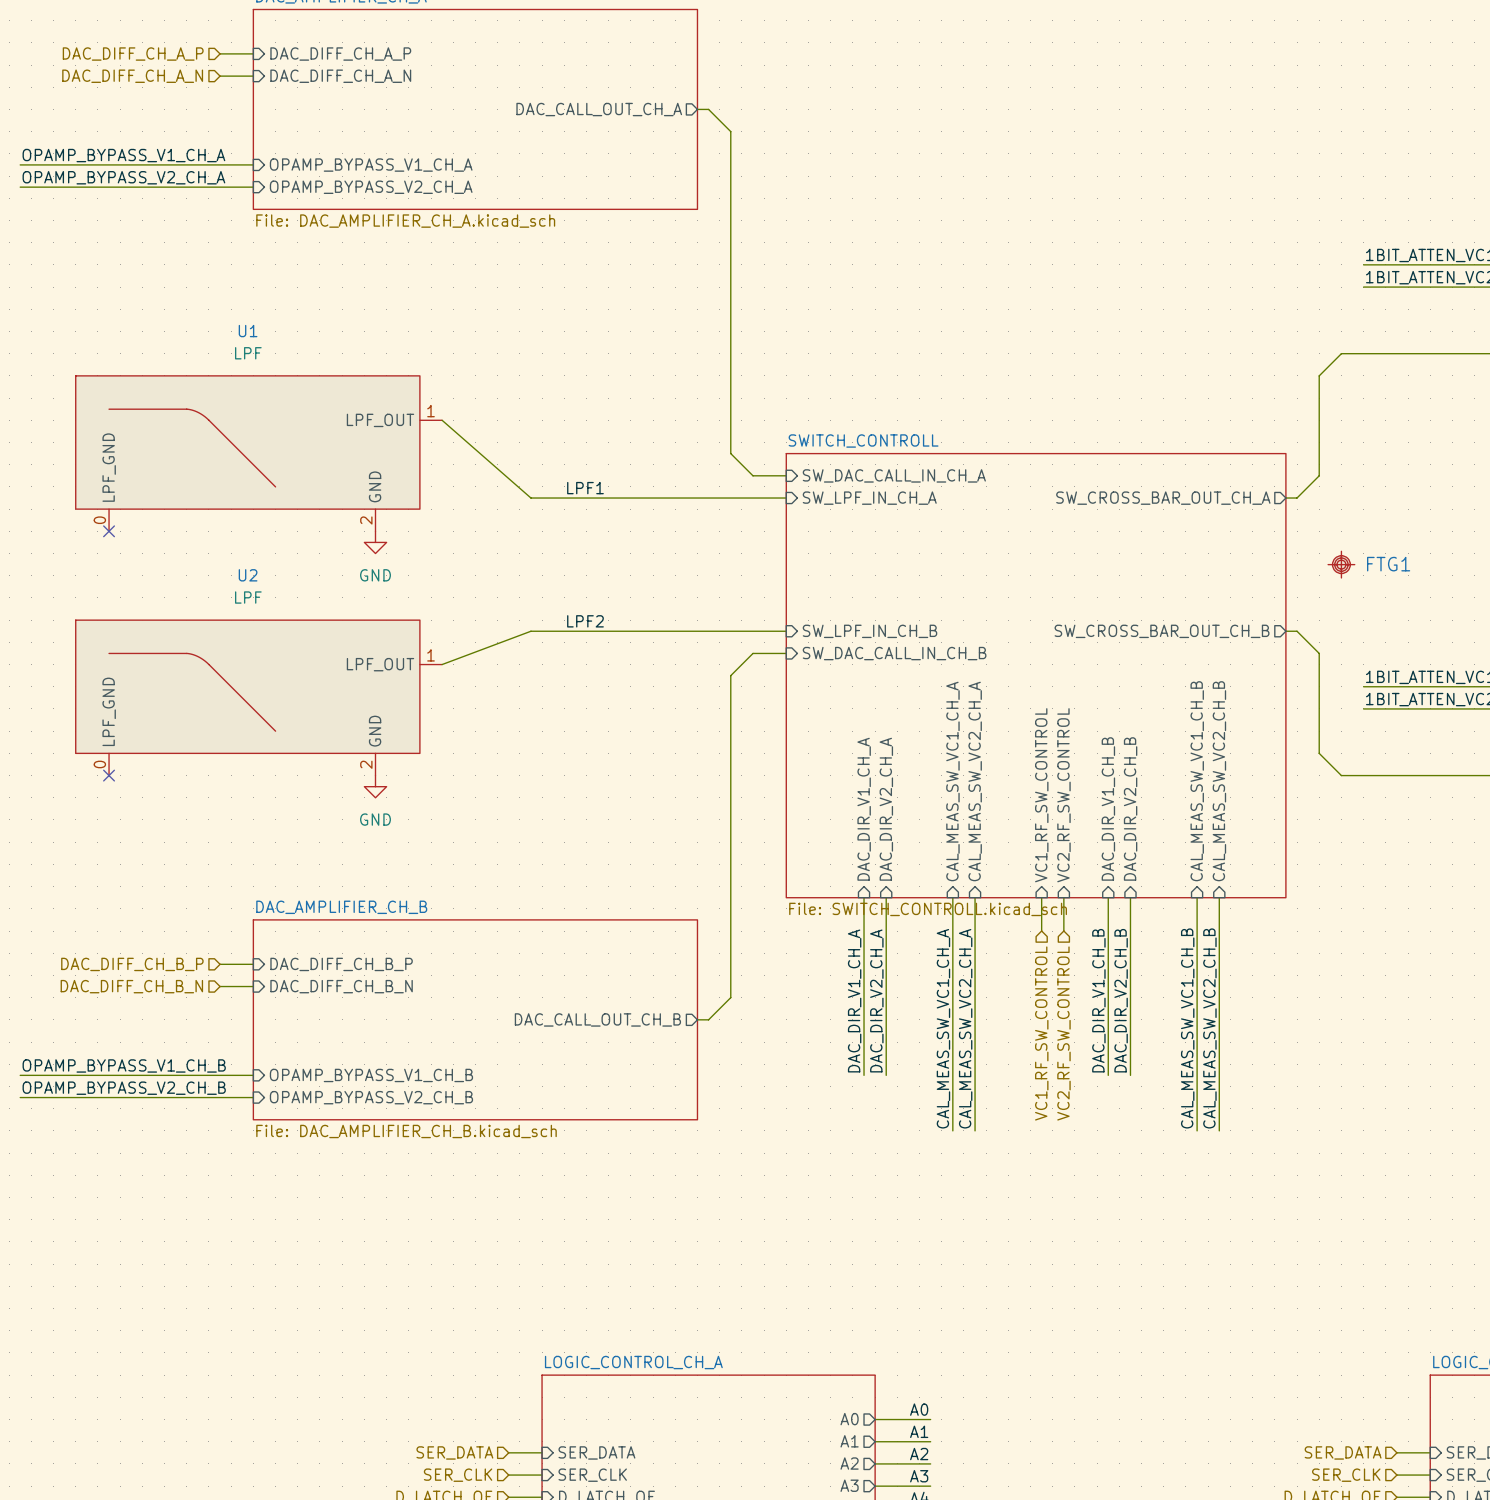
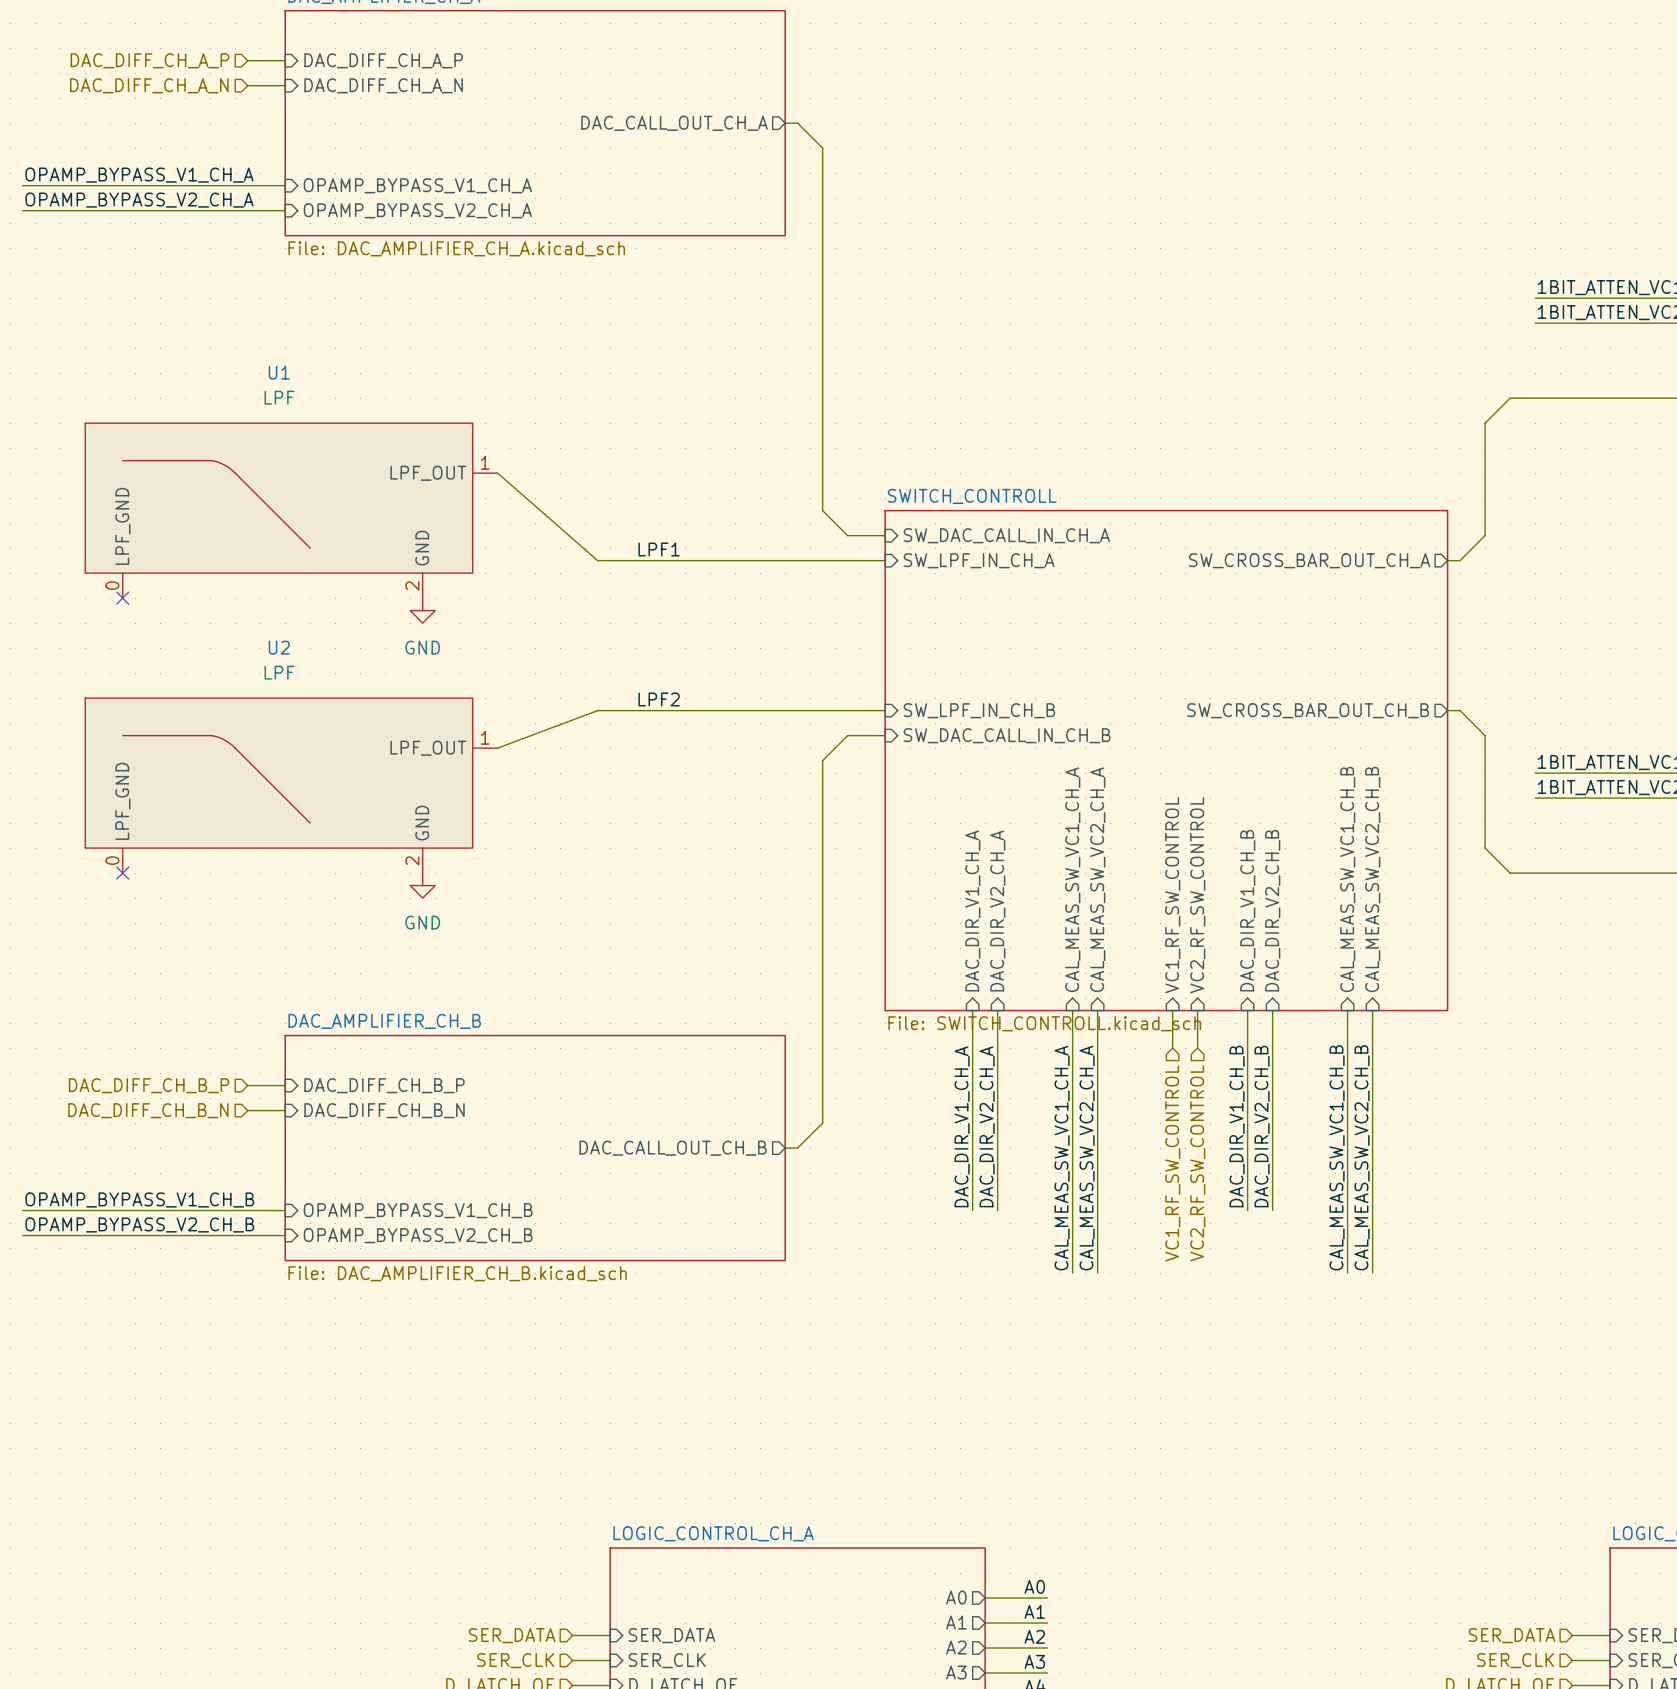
FTG1: (1341, 564) -> none

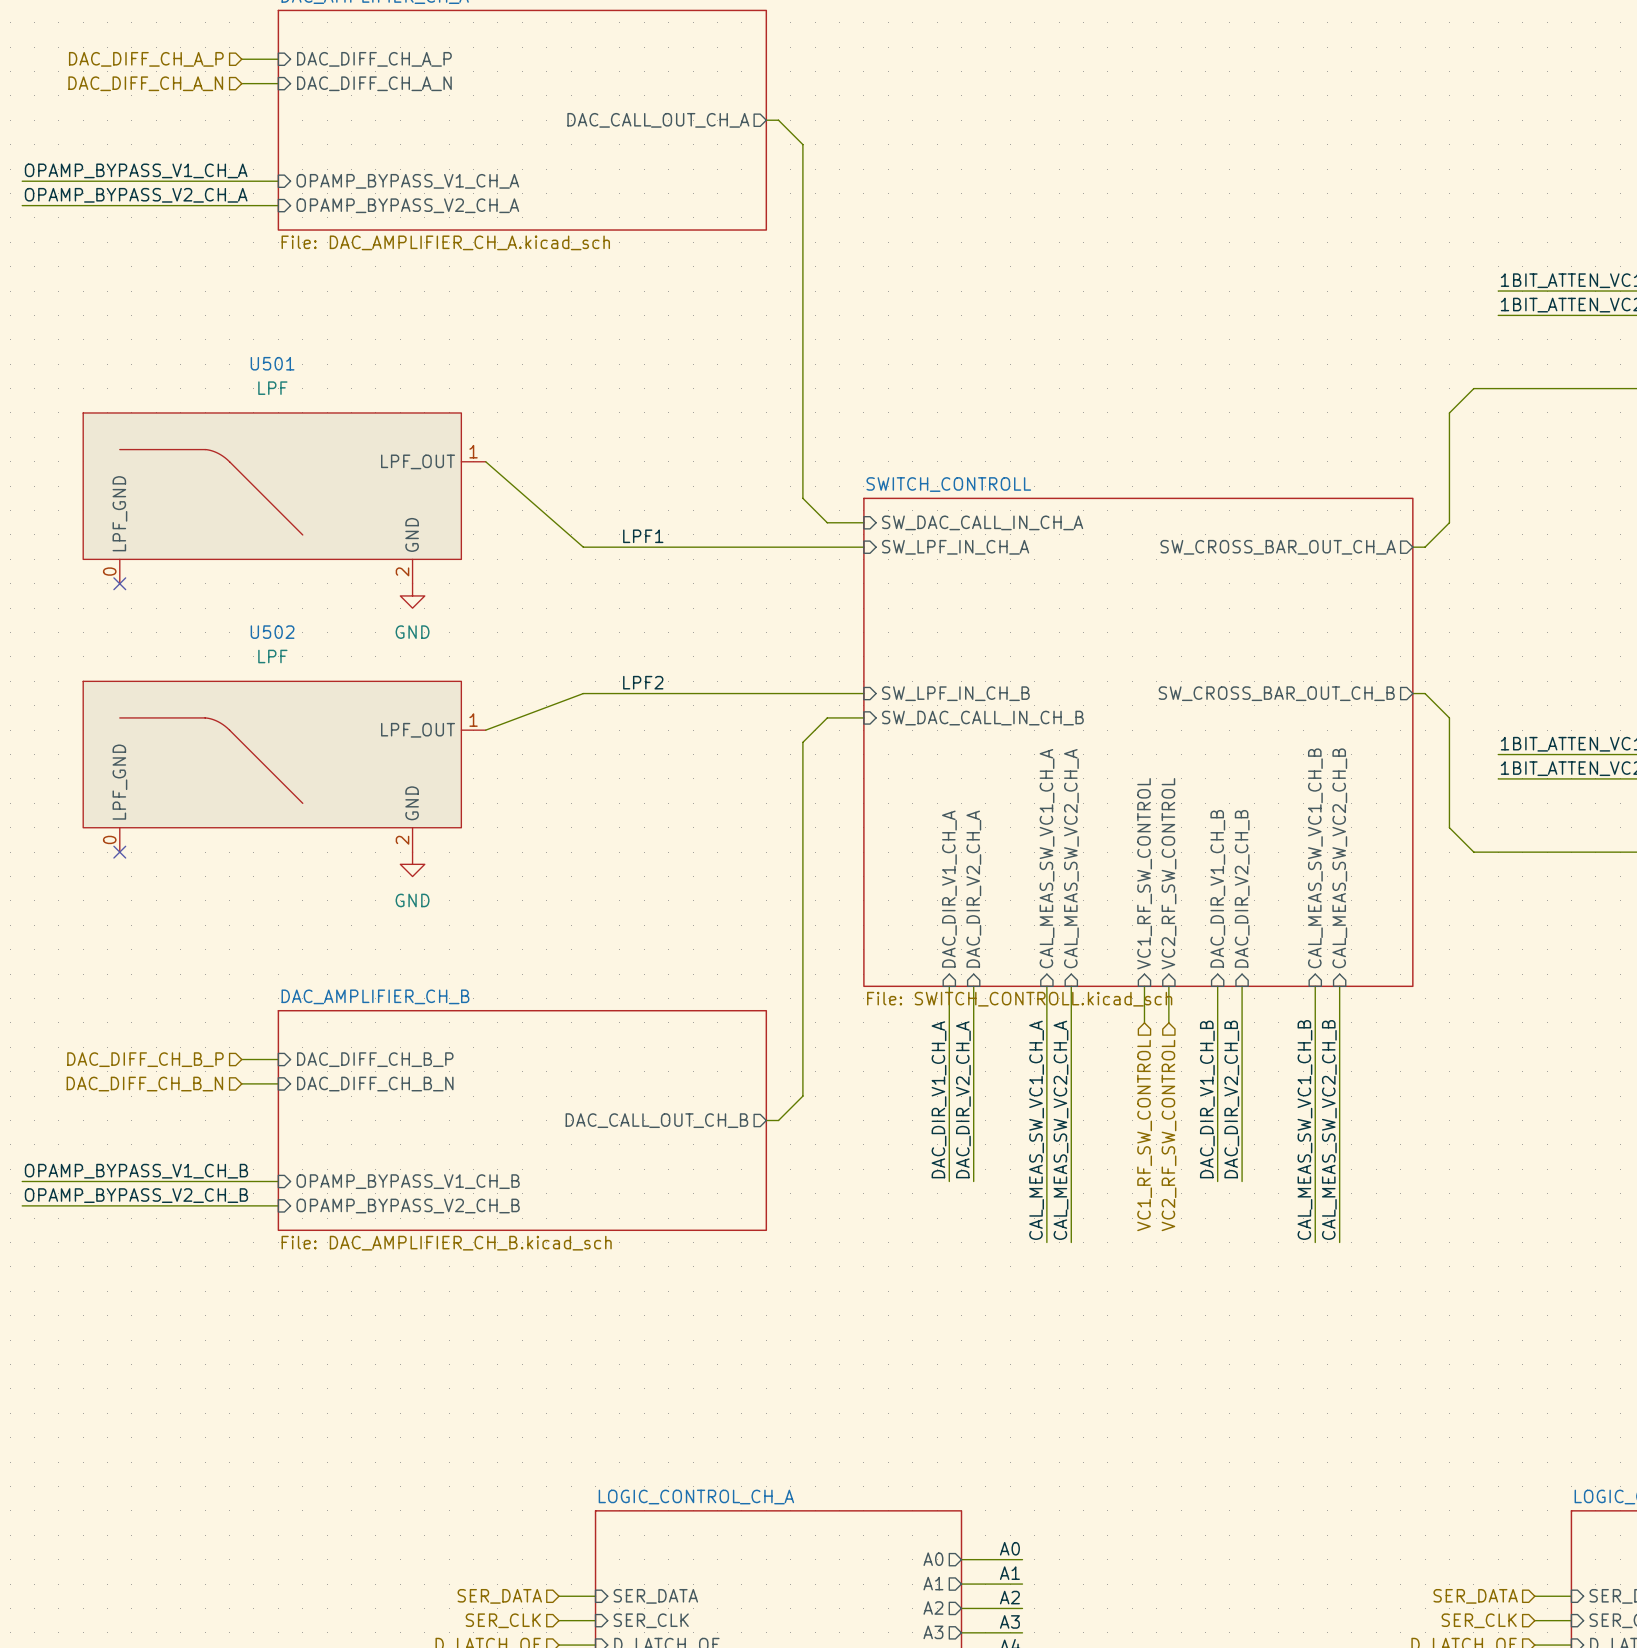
U1 name: U1 (279, 372) -> U501 (272, 363)
U2 name: U2 (279, 647) -> U502 (272, 632)

